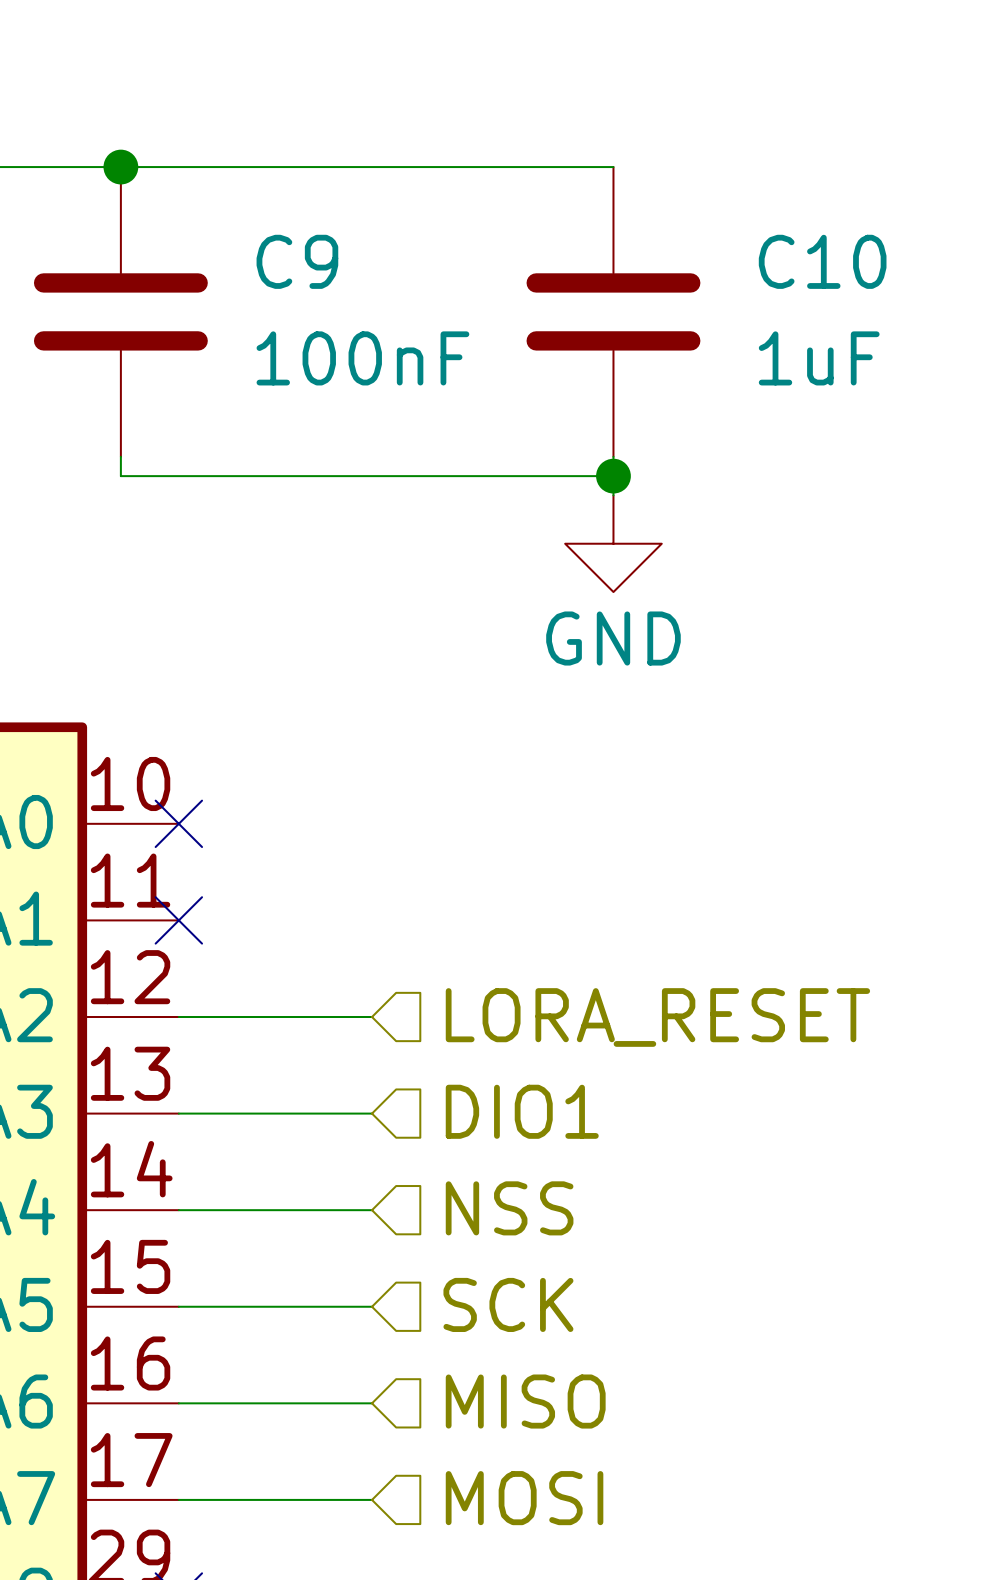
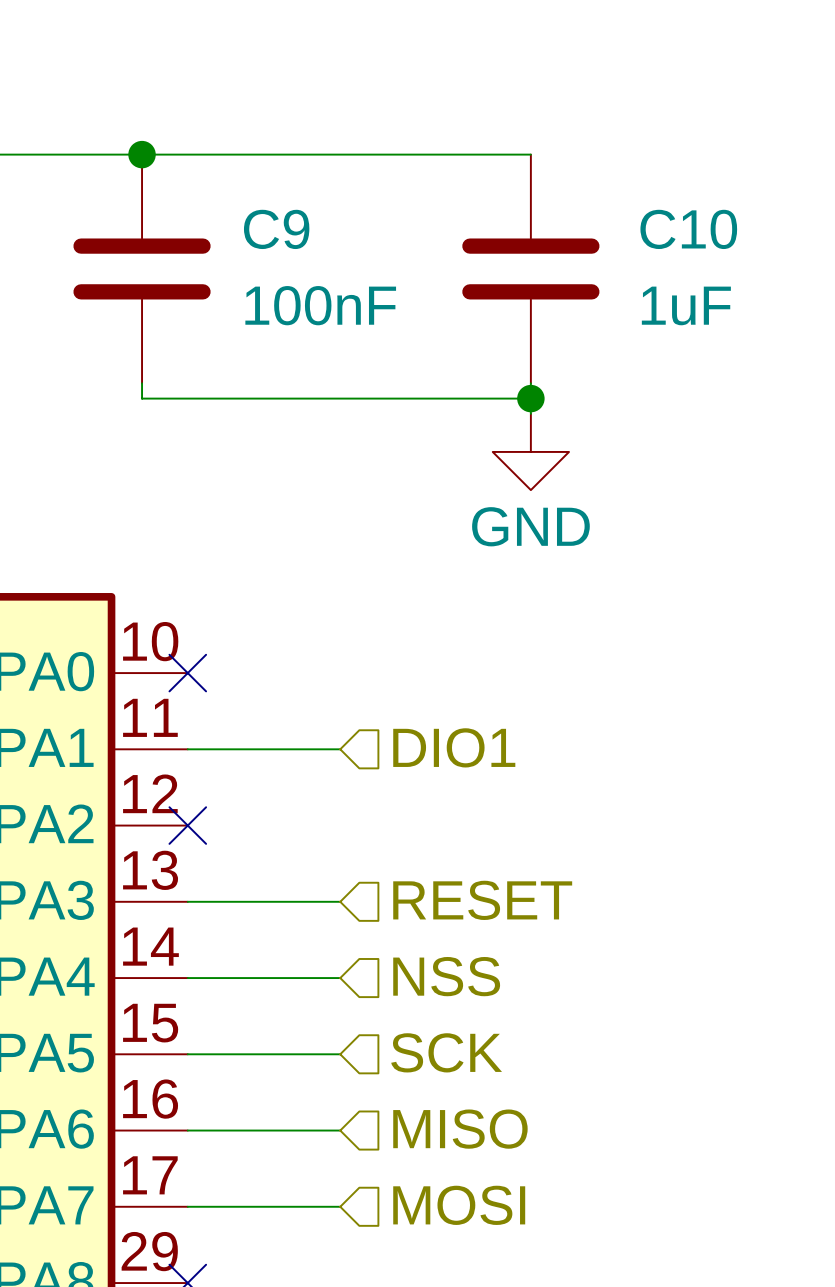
hierarchical label: none -> DIO1 (454, 747)
no-connect mark position: (178, 920) -> (187, 825)
wire: (178, 1017) (372, 1017) -> (187, 749) (340, 749)
hierarchical label: LORA_RESET (657, 1017) -> none
hierarchical label: DIO1 (522, 1111) -> RESET (482, 900)

